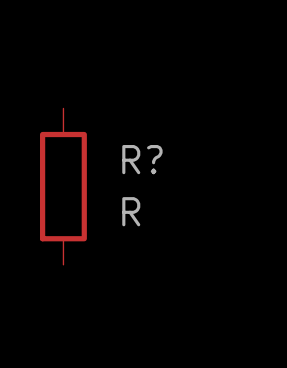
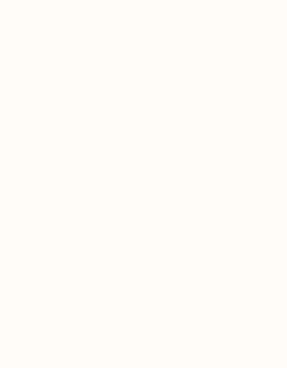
R?: R (63, 186) -> none

